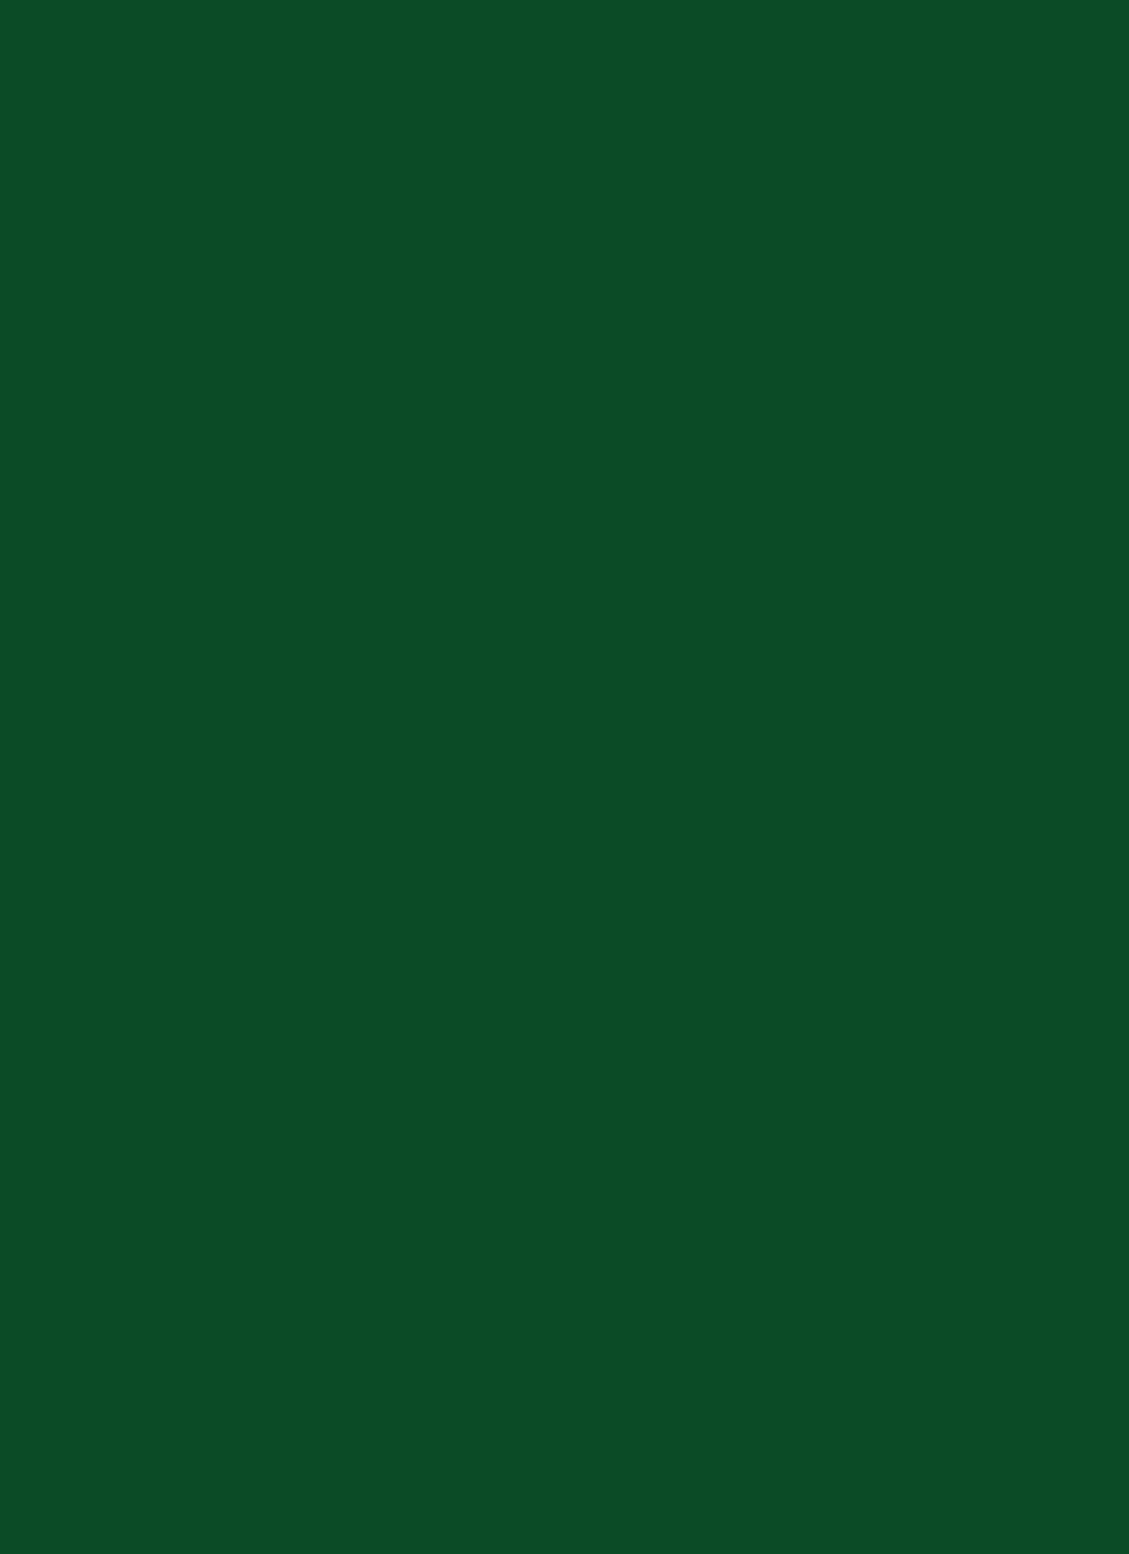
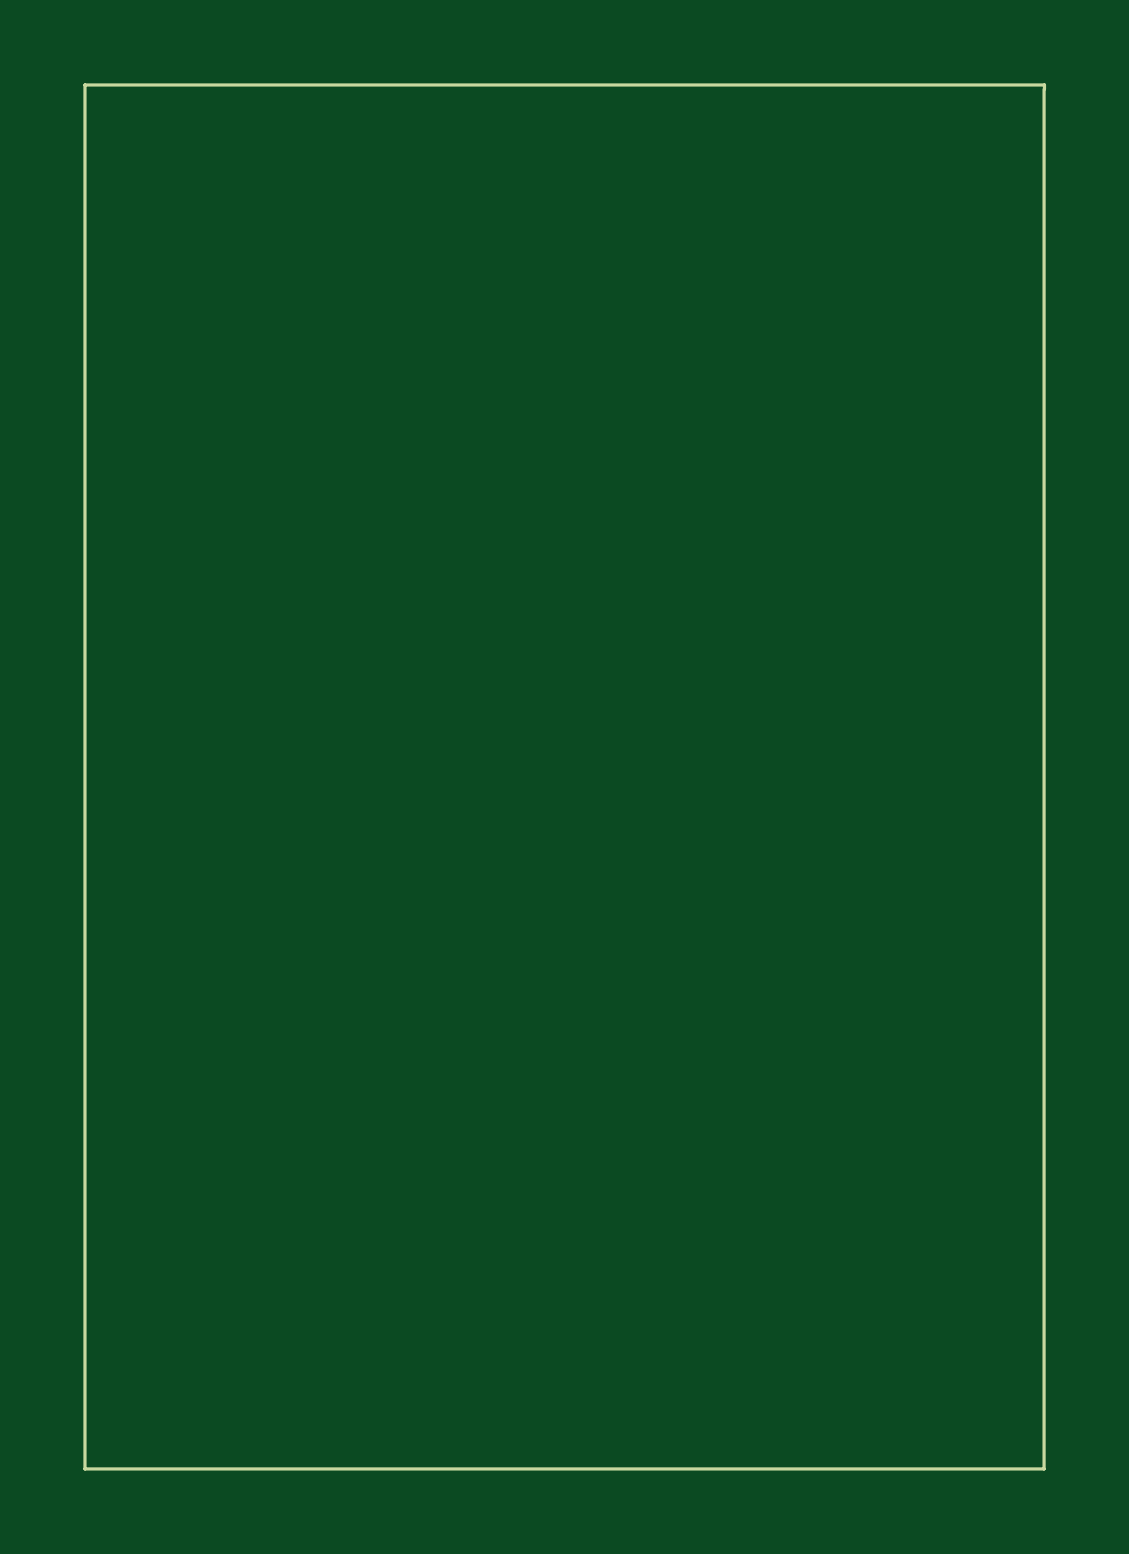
board edge: none -> (1044, 89) (1044, 84) (84, 84) (84, 1468) (1044, 1468) (1044, 89)

